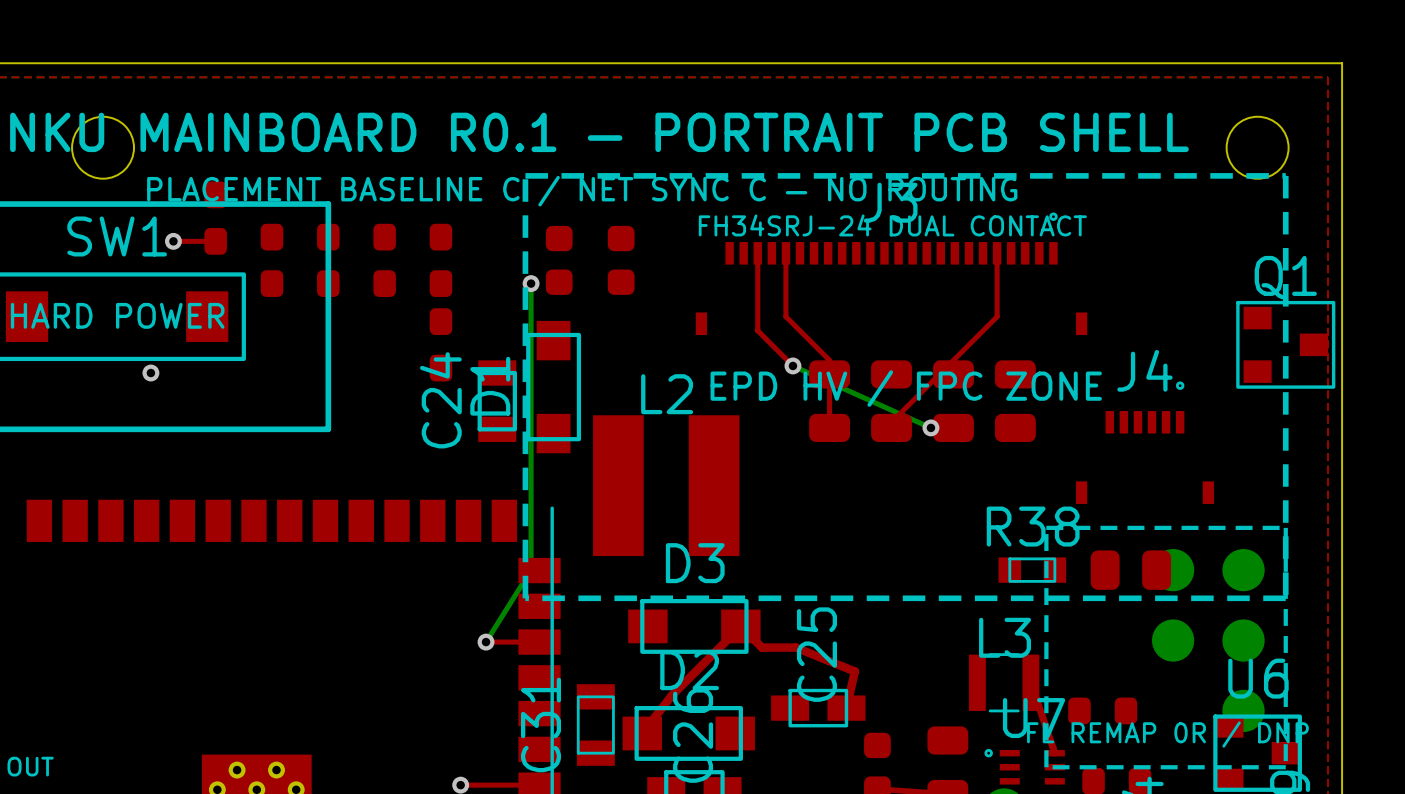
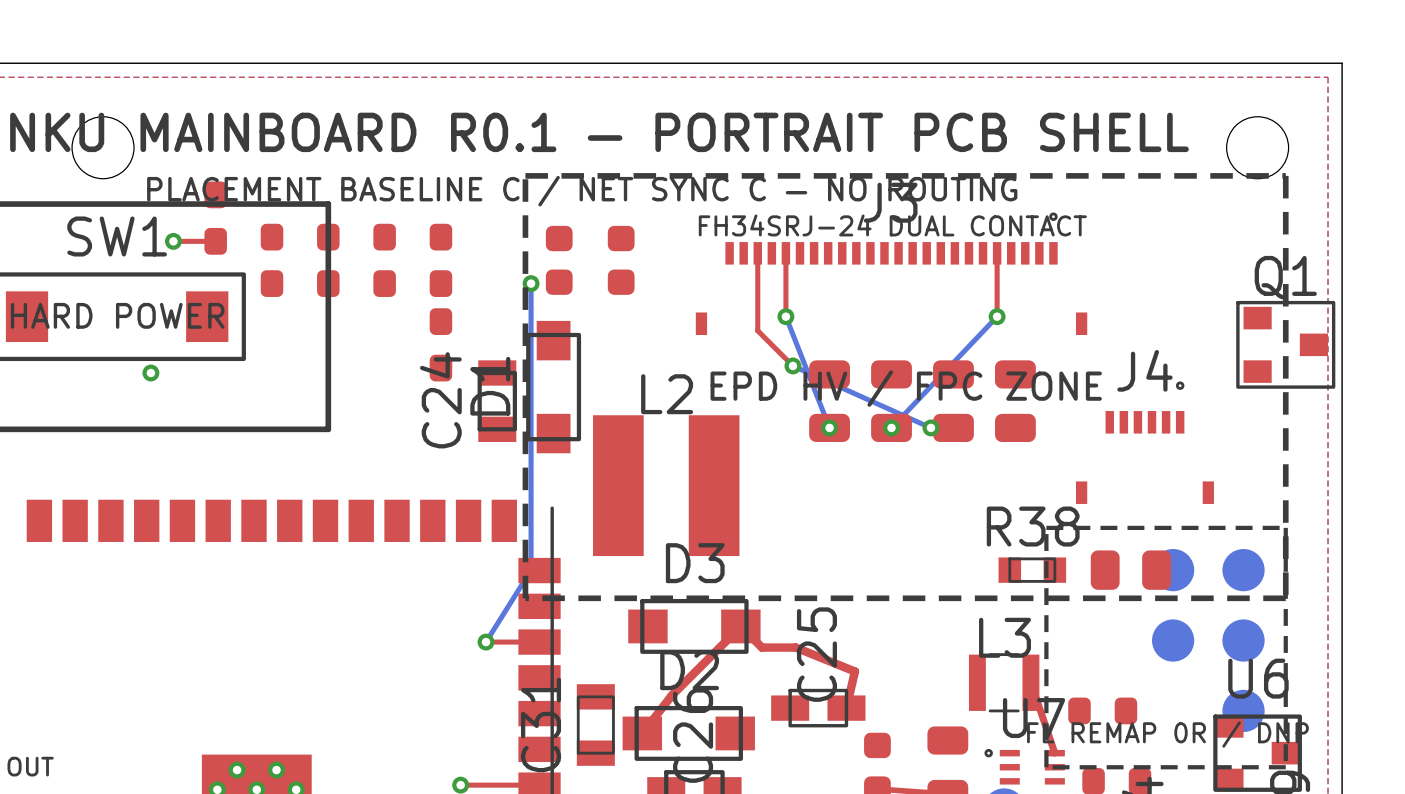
top track: (785, 316) (829, 360) (829, 427) -> none
bottom track: none -> (785, 316) (829, 427)
via: none -> (785, 316)
top track: (997, 316) (891, 422) (891, 427) -> none
bottom track: none -> (997, 316) (891, 427)
via: none -> (997, 316)
via: none -> (829, 427)
via: none -> (891, 427)

